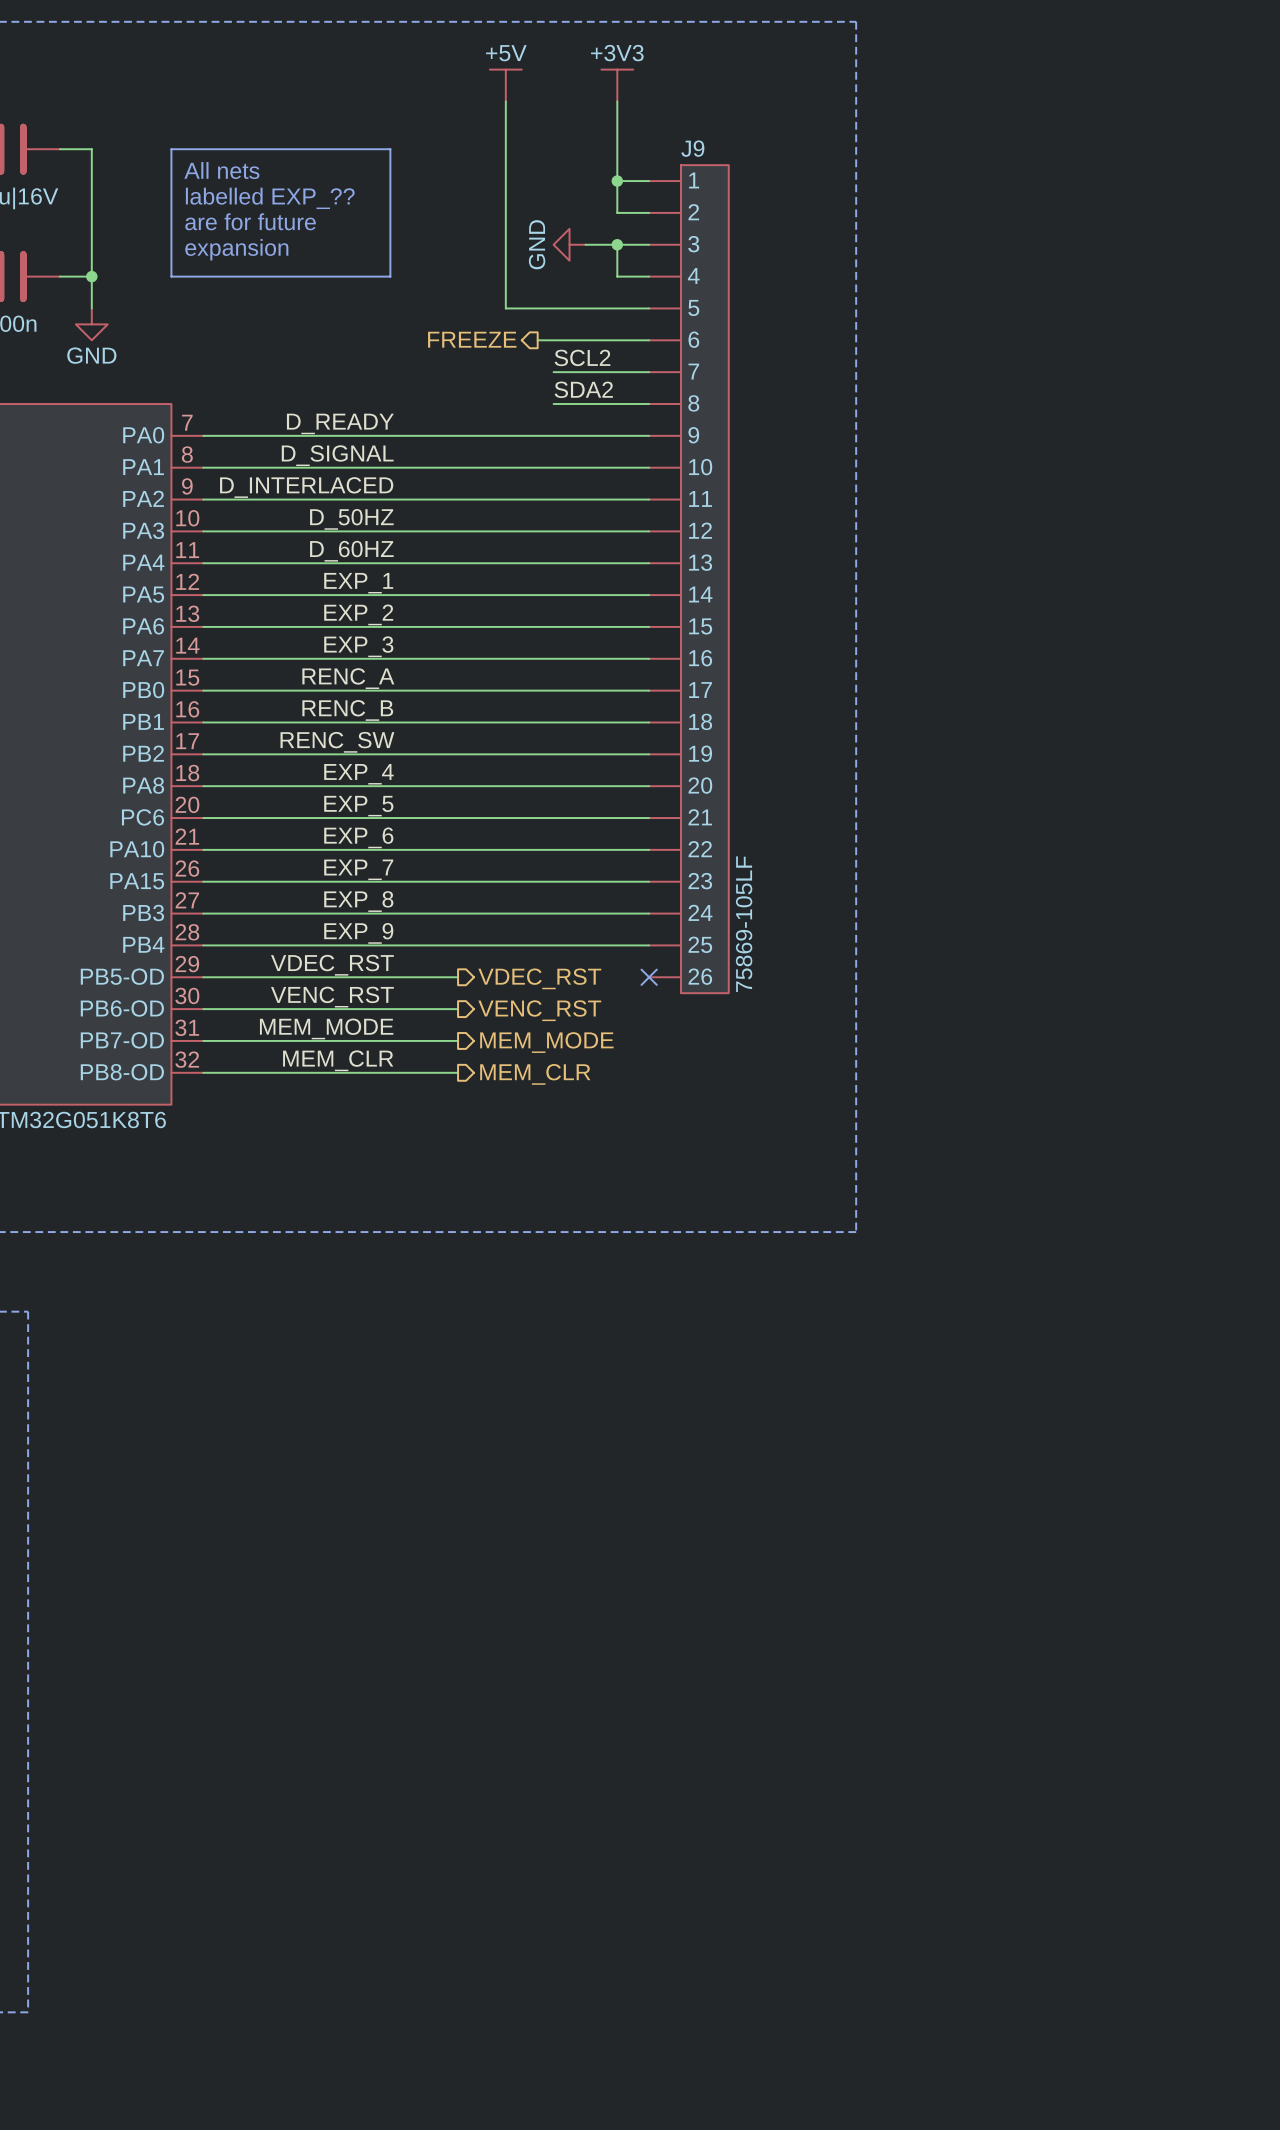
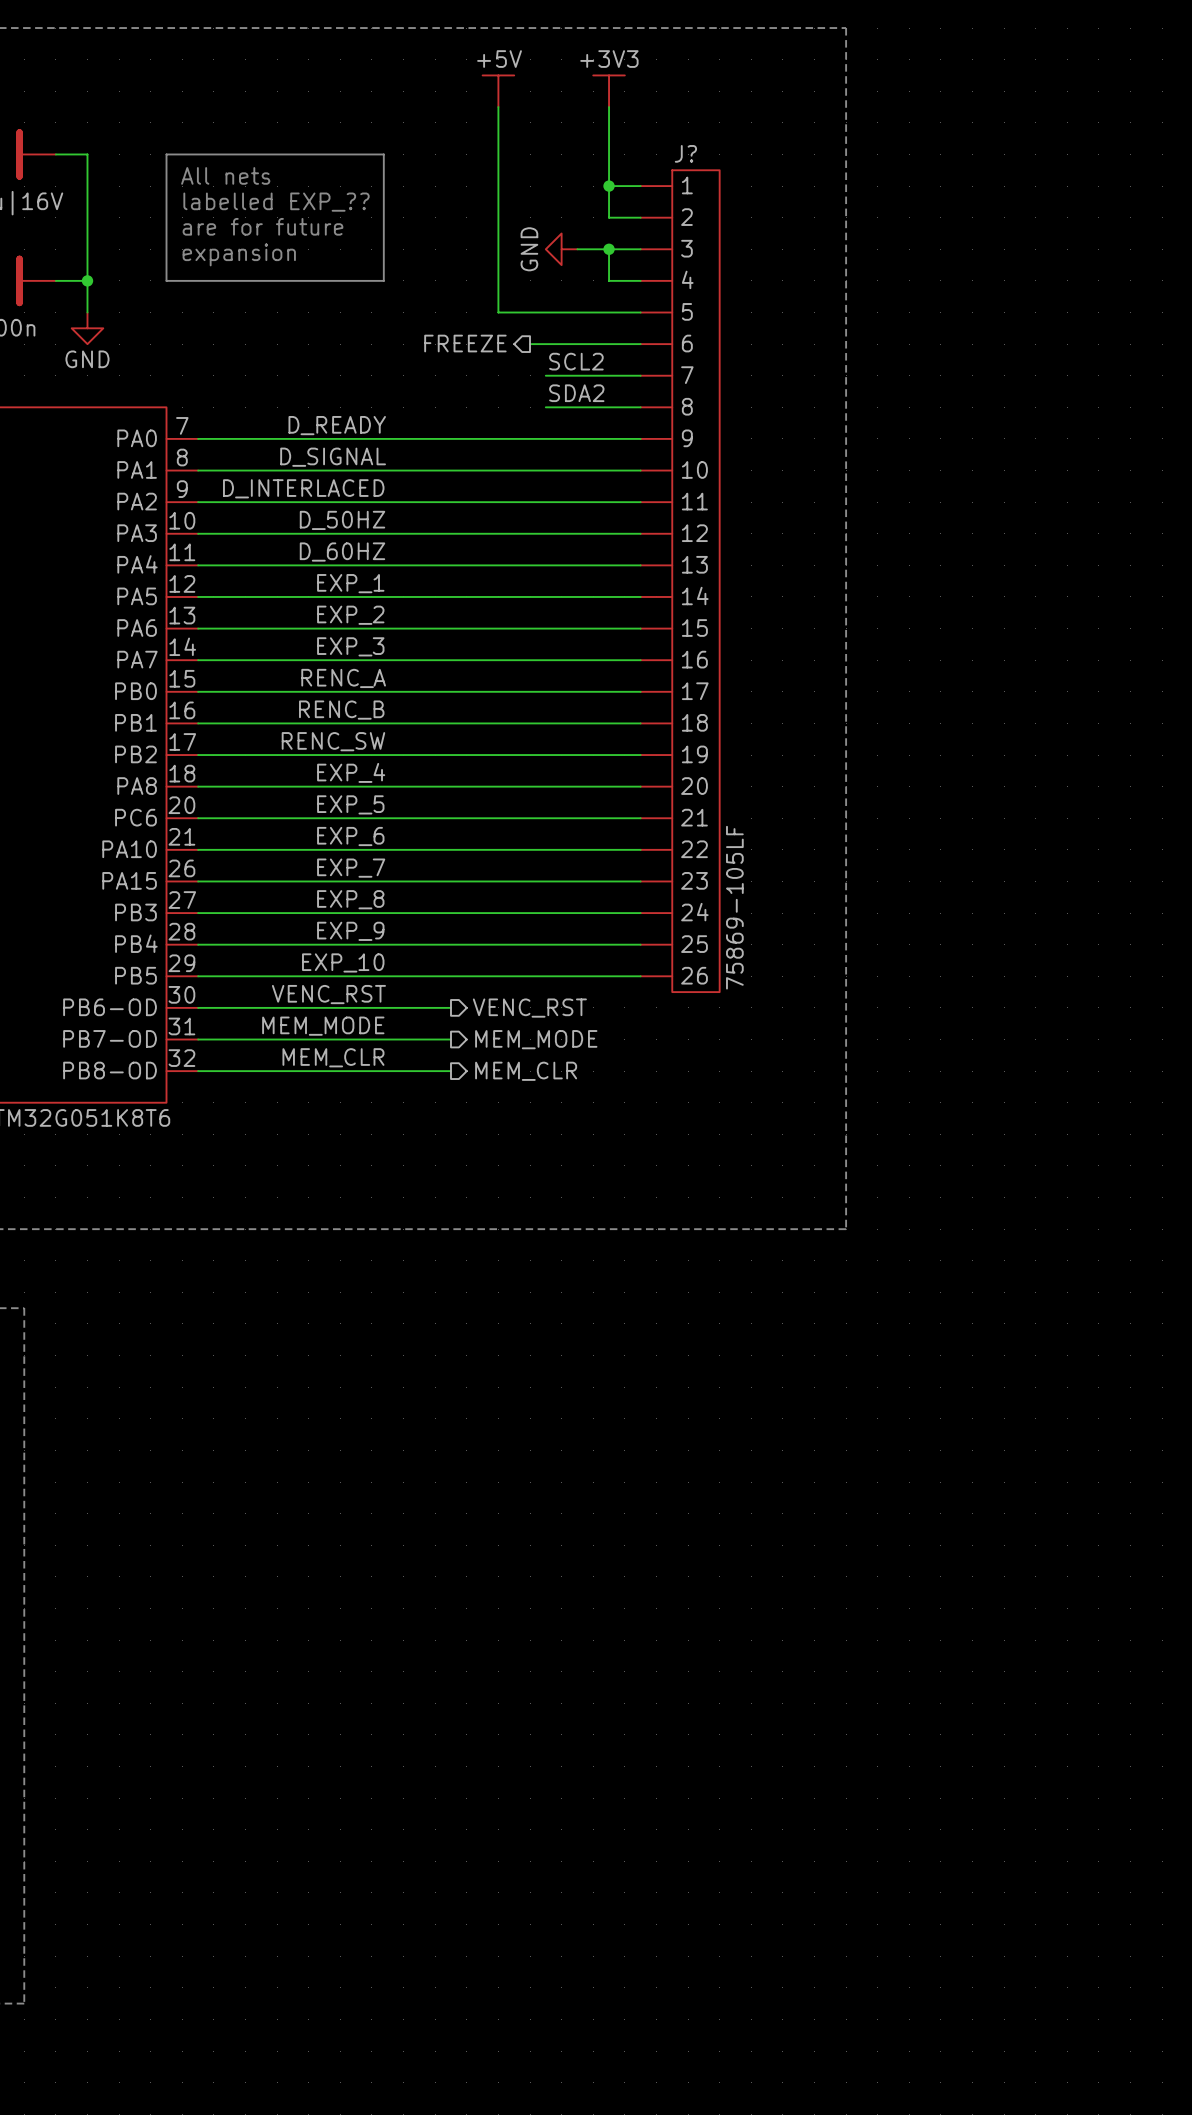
J9 name: J9 (692, 148) -> J? (685, 153)
label: VDEC_RST (332, 965) -> EXP_10 (343, 962)
part pin name: PB5-OD (122, 976) -> PB5 (135, 975)
wire: none -> (450, 976) (640, 976)
no-connect mark: (649, 977) -> none
hierarchical label: VDEC_RST (539, 978) -> none

